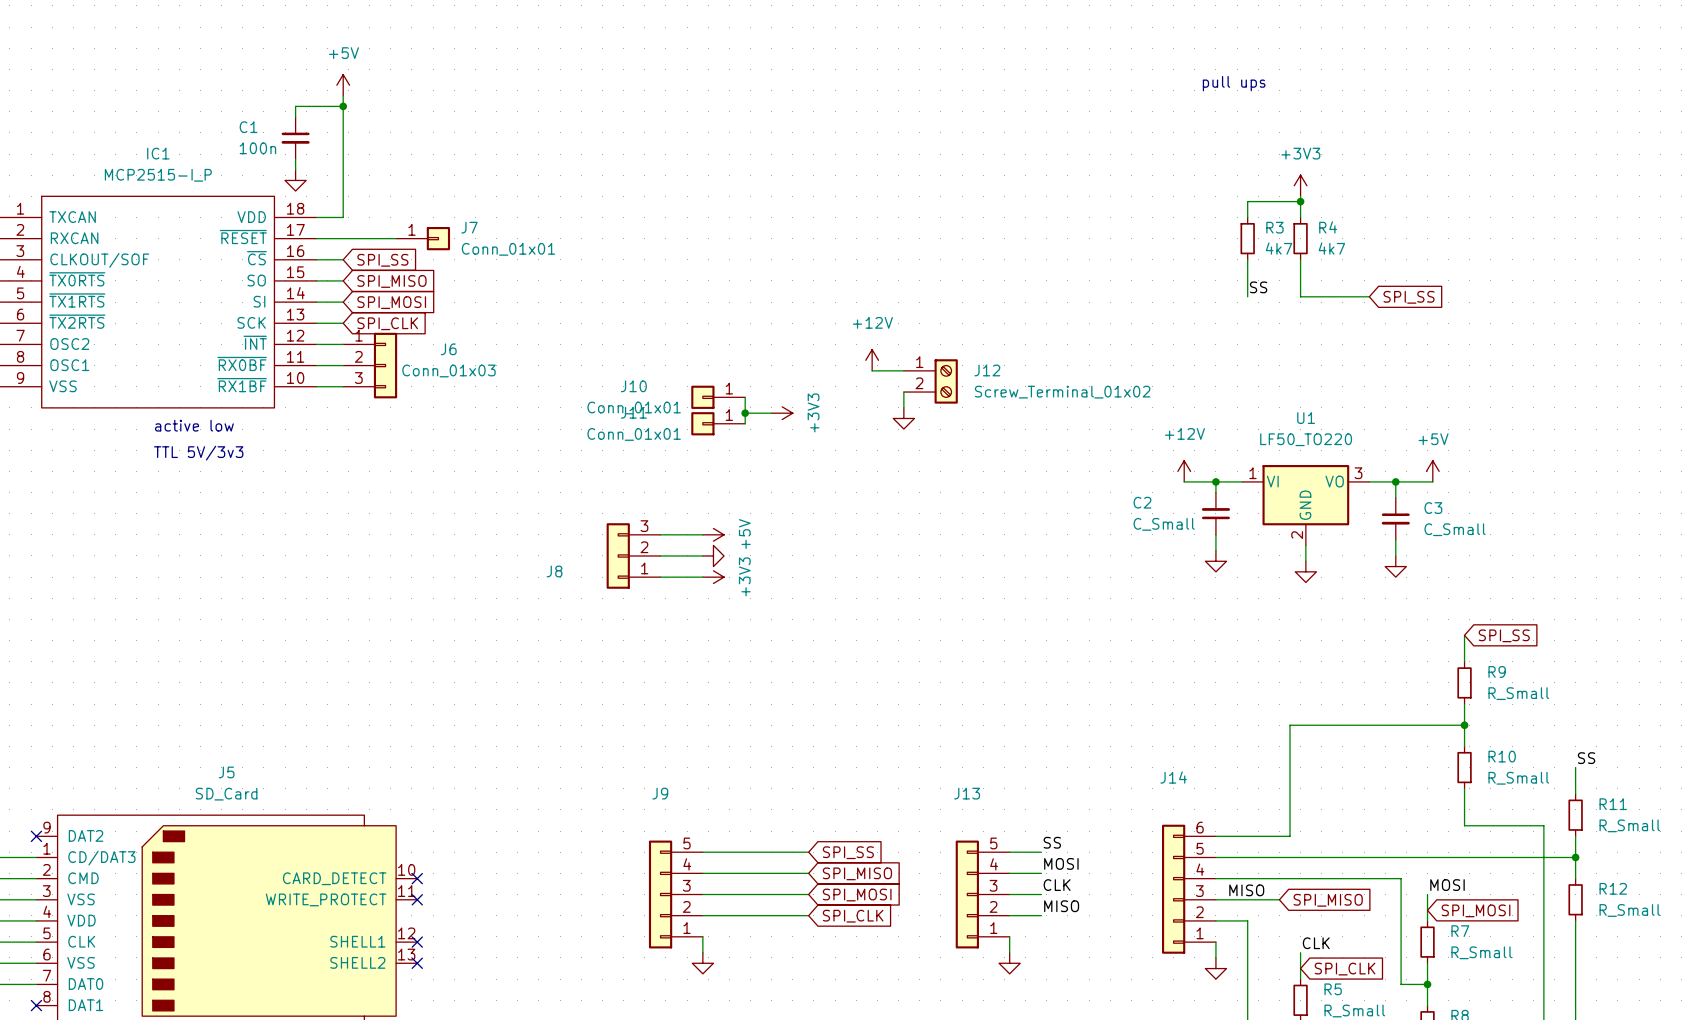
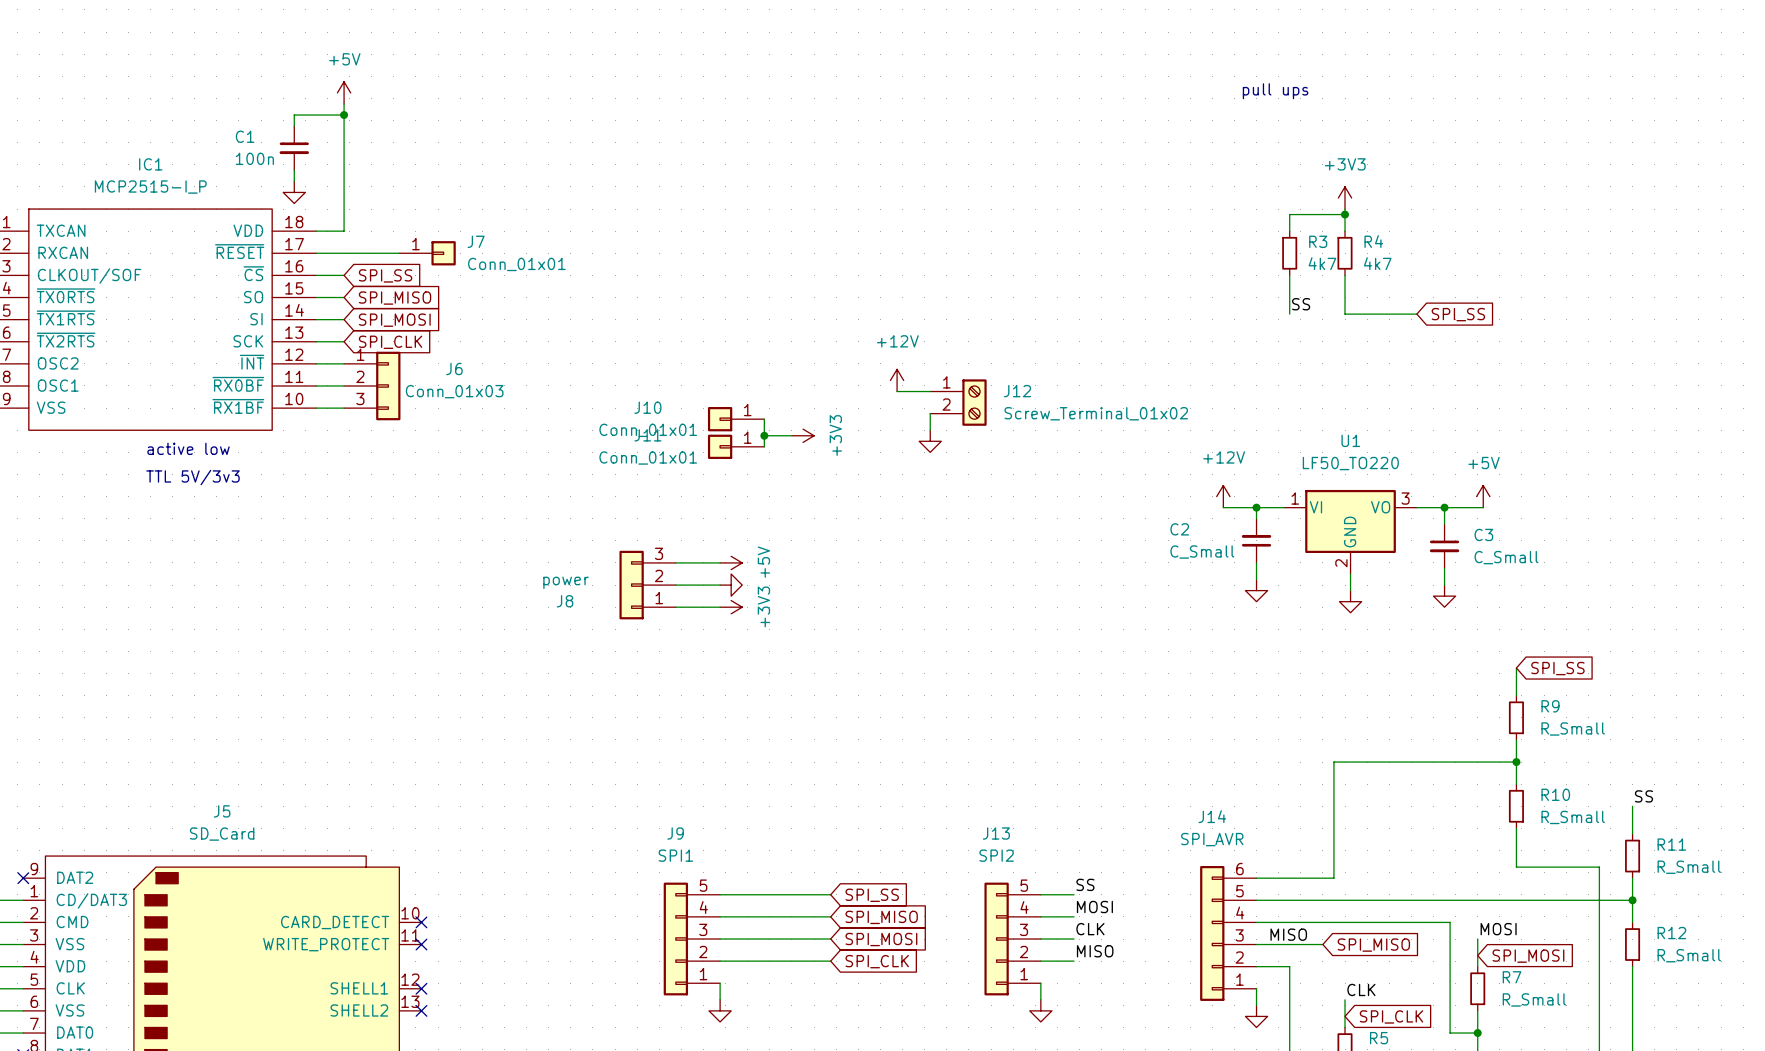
J8 value: none -> power (566, 582)
J14 value: none -> SPI_AVR (1212, 839)
J9 value: none -> SPI1 (675, 855)
J13 value: none -> SPI2 (996, 855)

